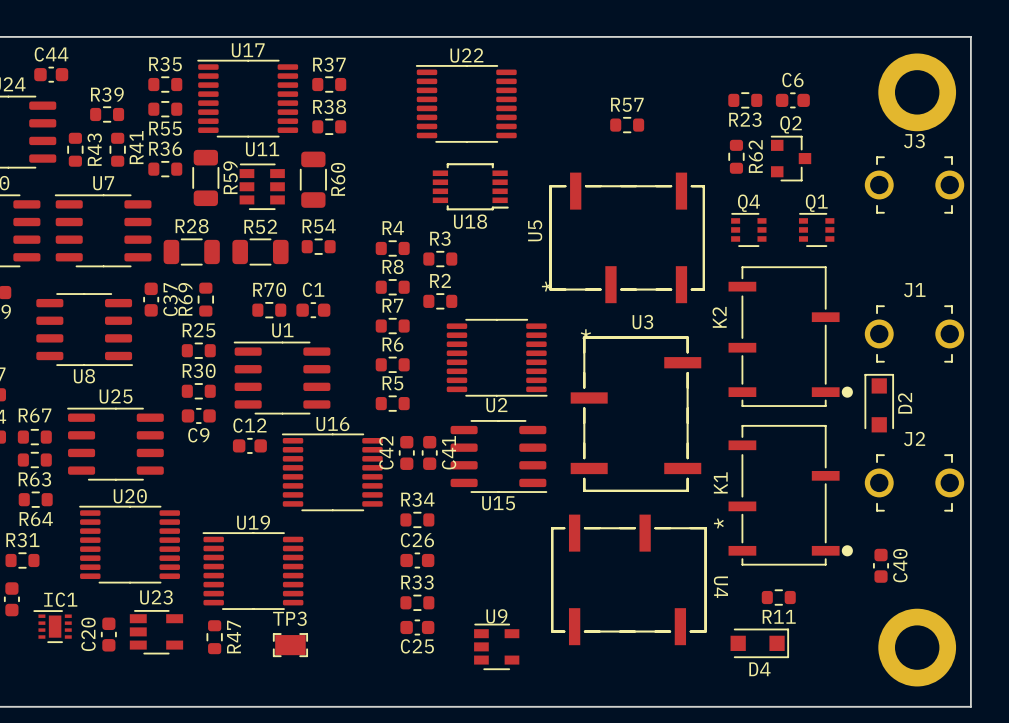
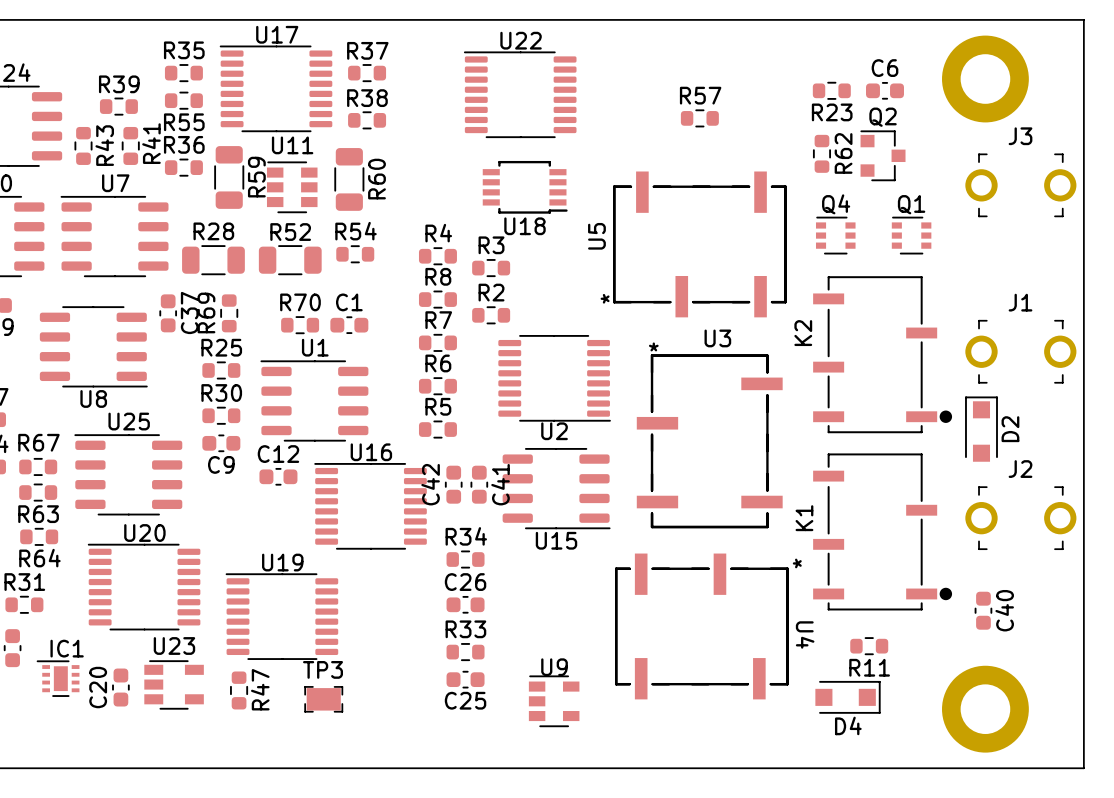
C44: (51, 74) -> none
part position: (917, 92) -> (985, 79)
part position: (917, 647) -> (985, 709)

